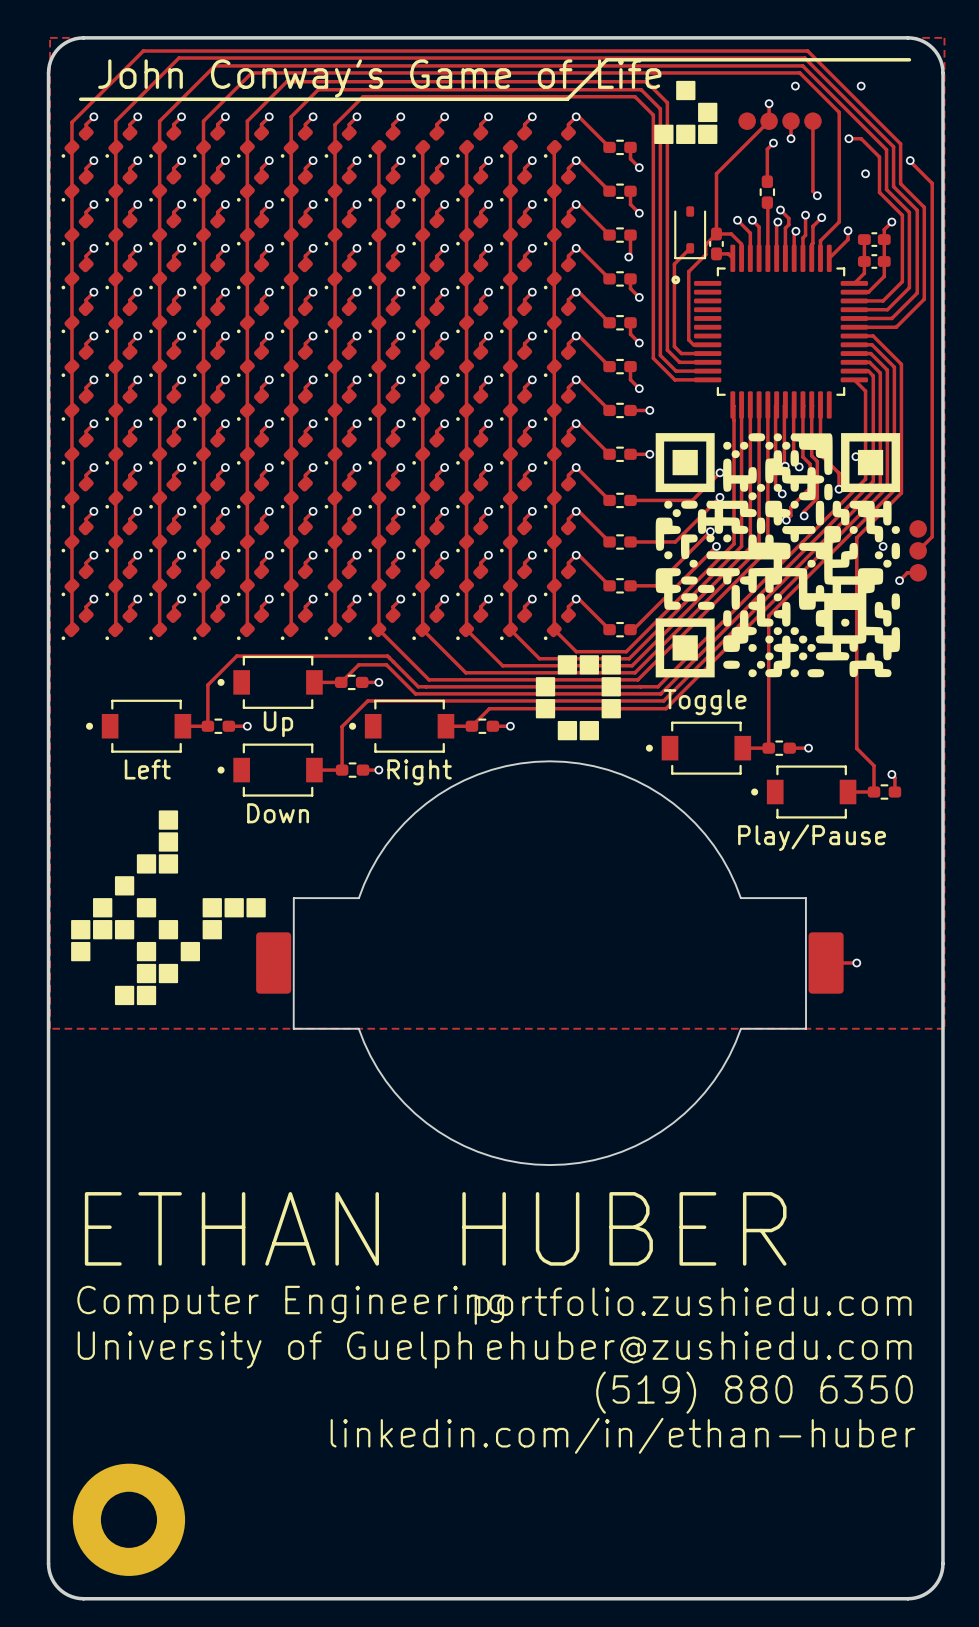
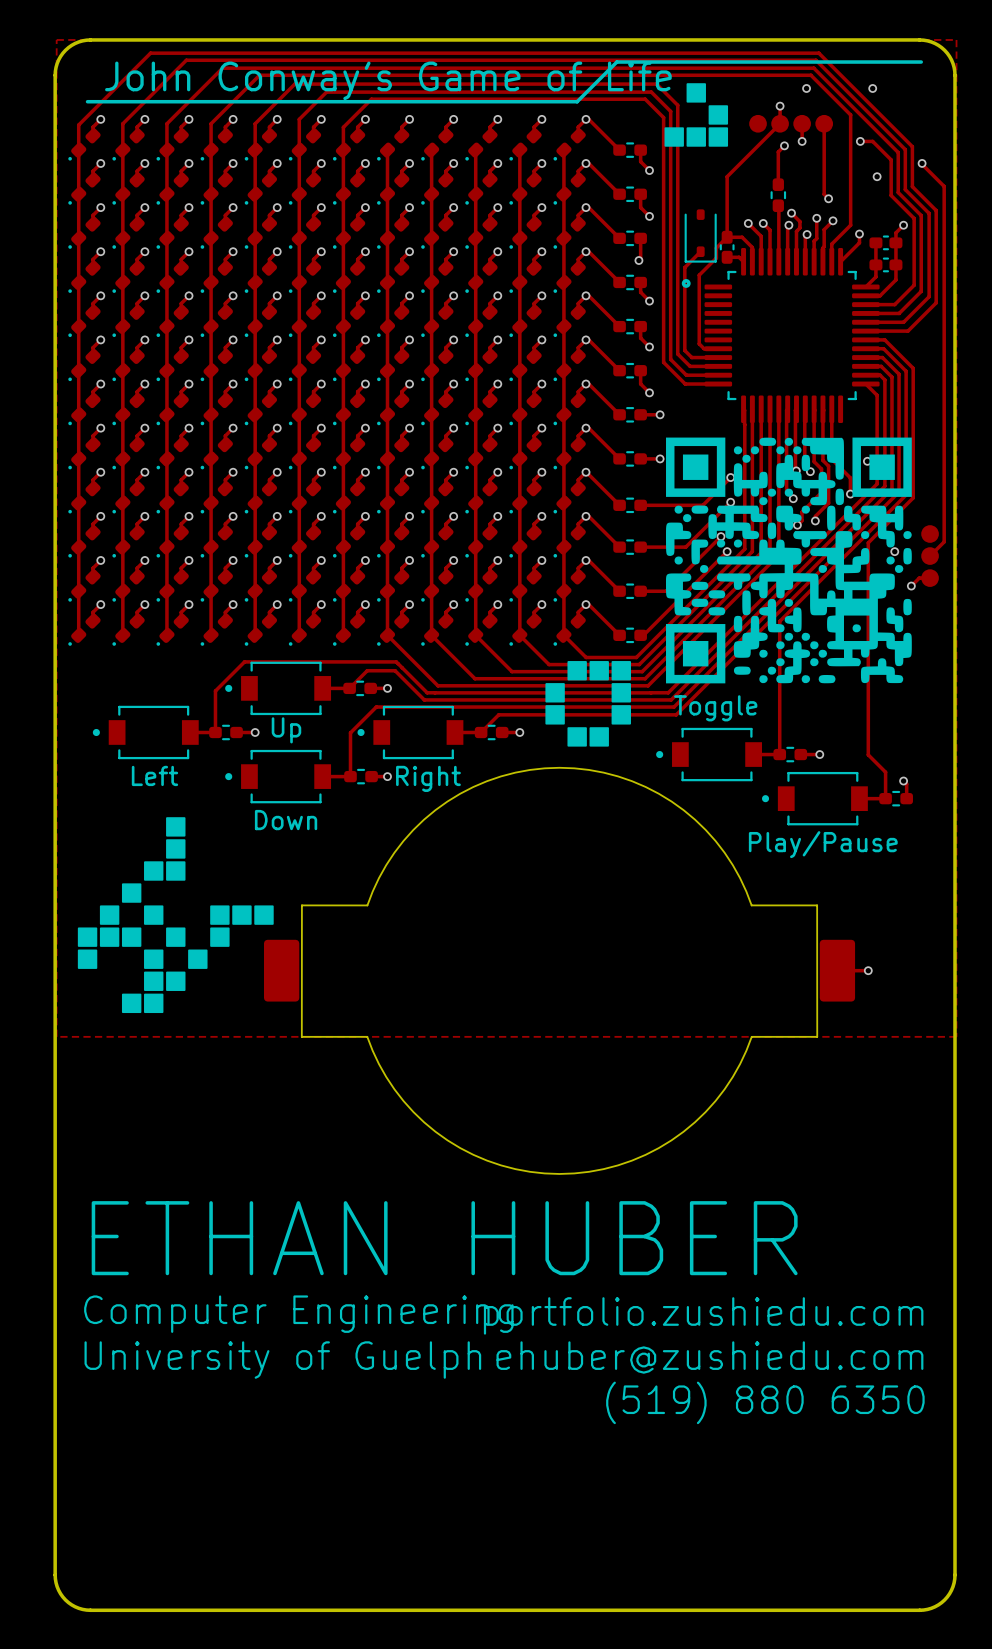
text: linkedin.com/in/ethan-huber (622, 1435) -> none
part: (128, 1519) -> none

